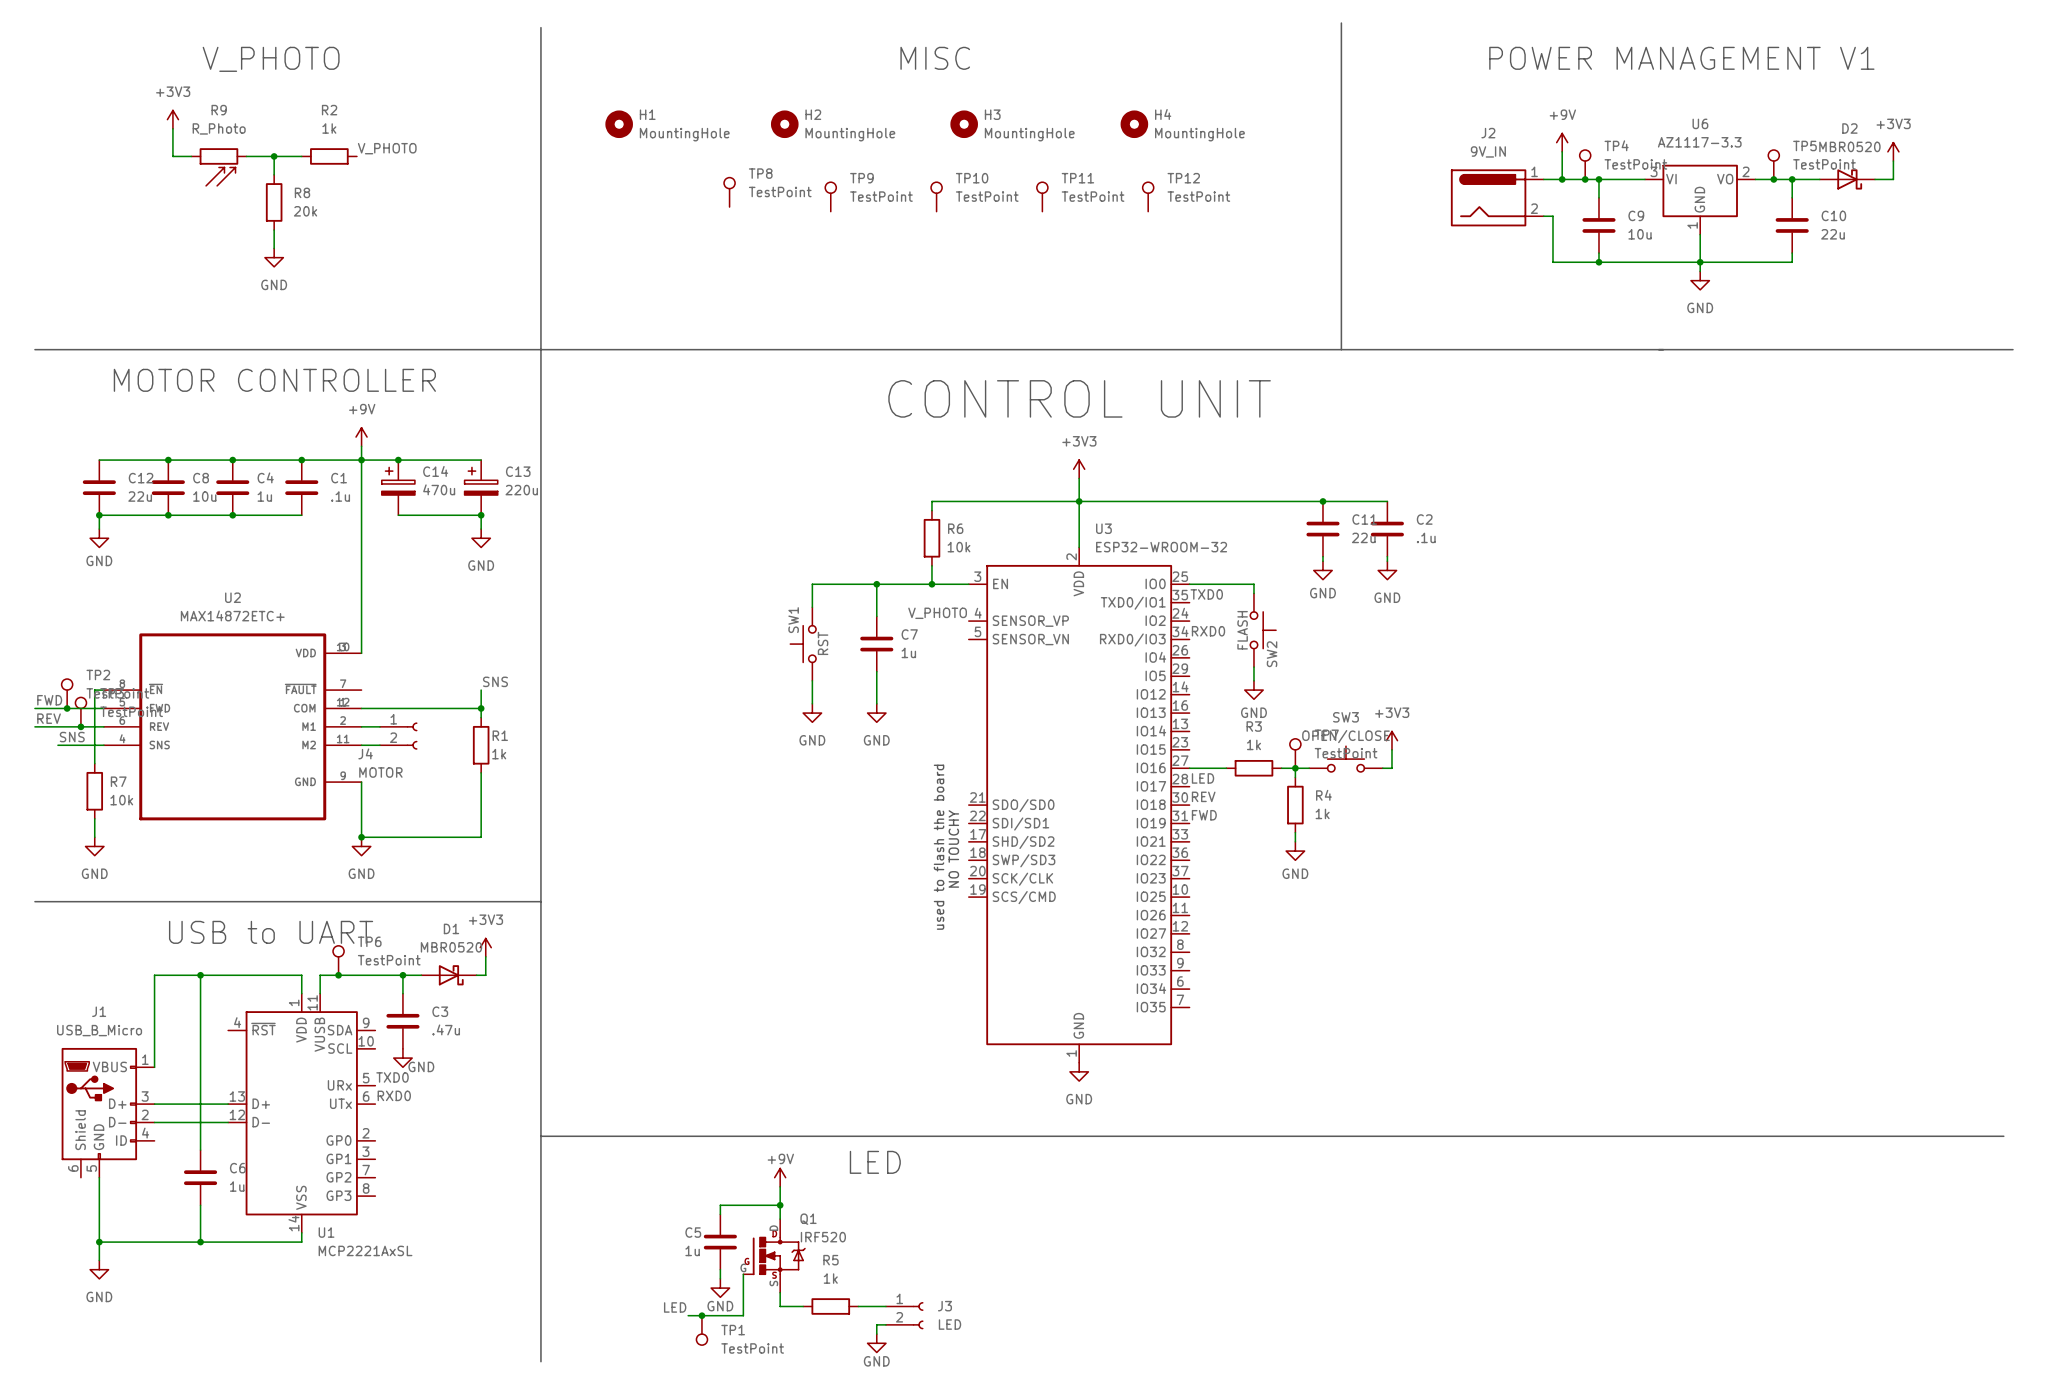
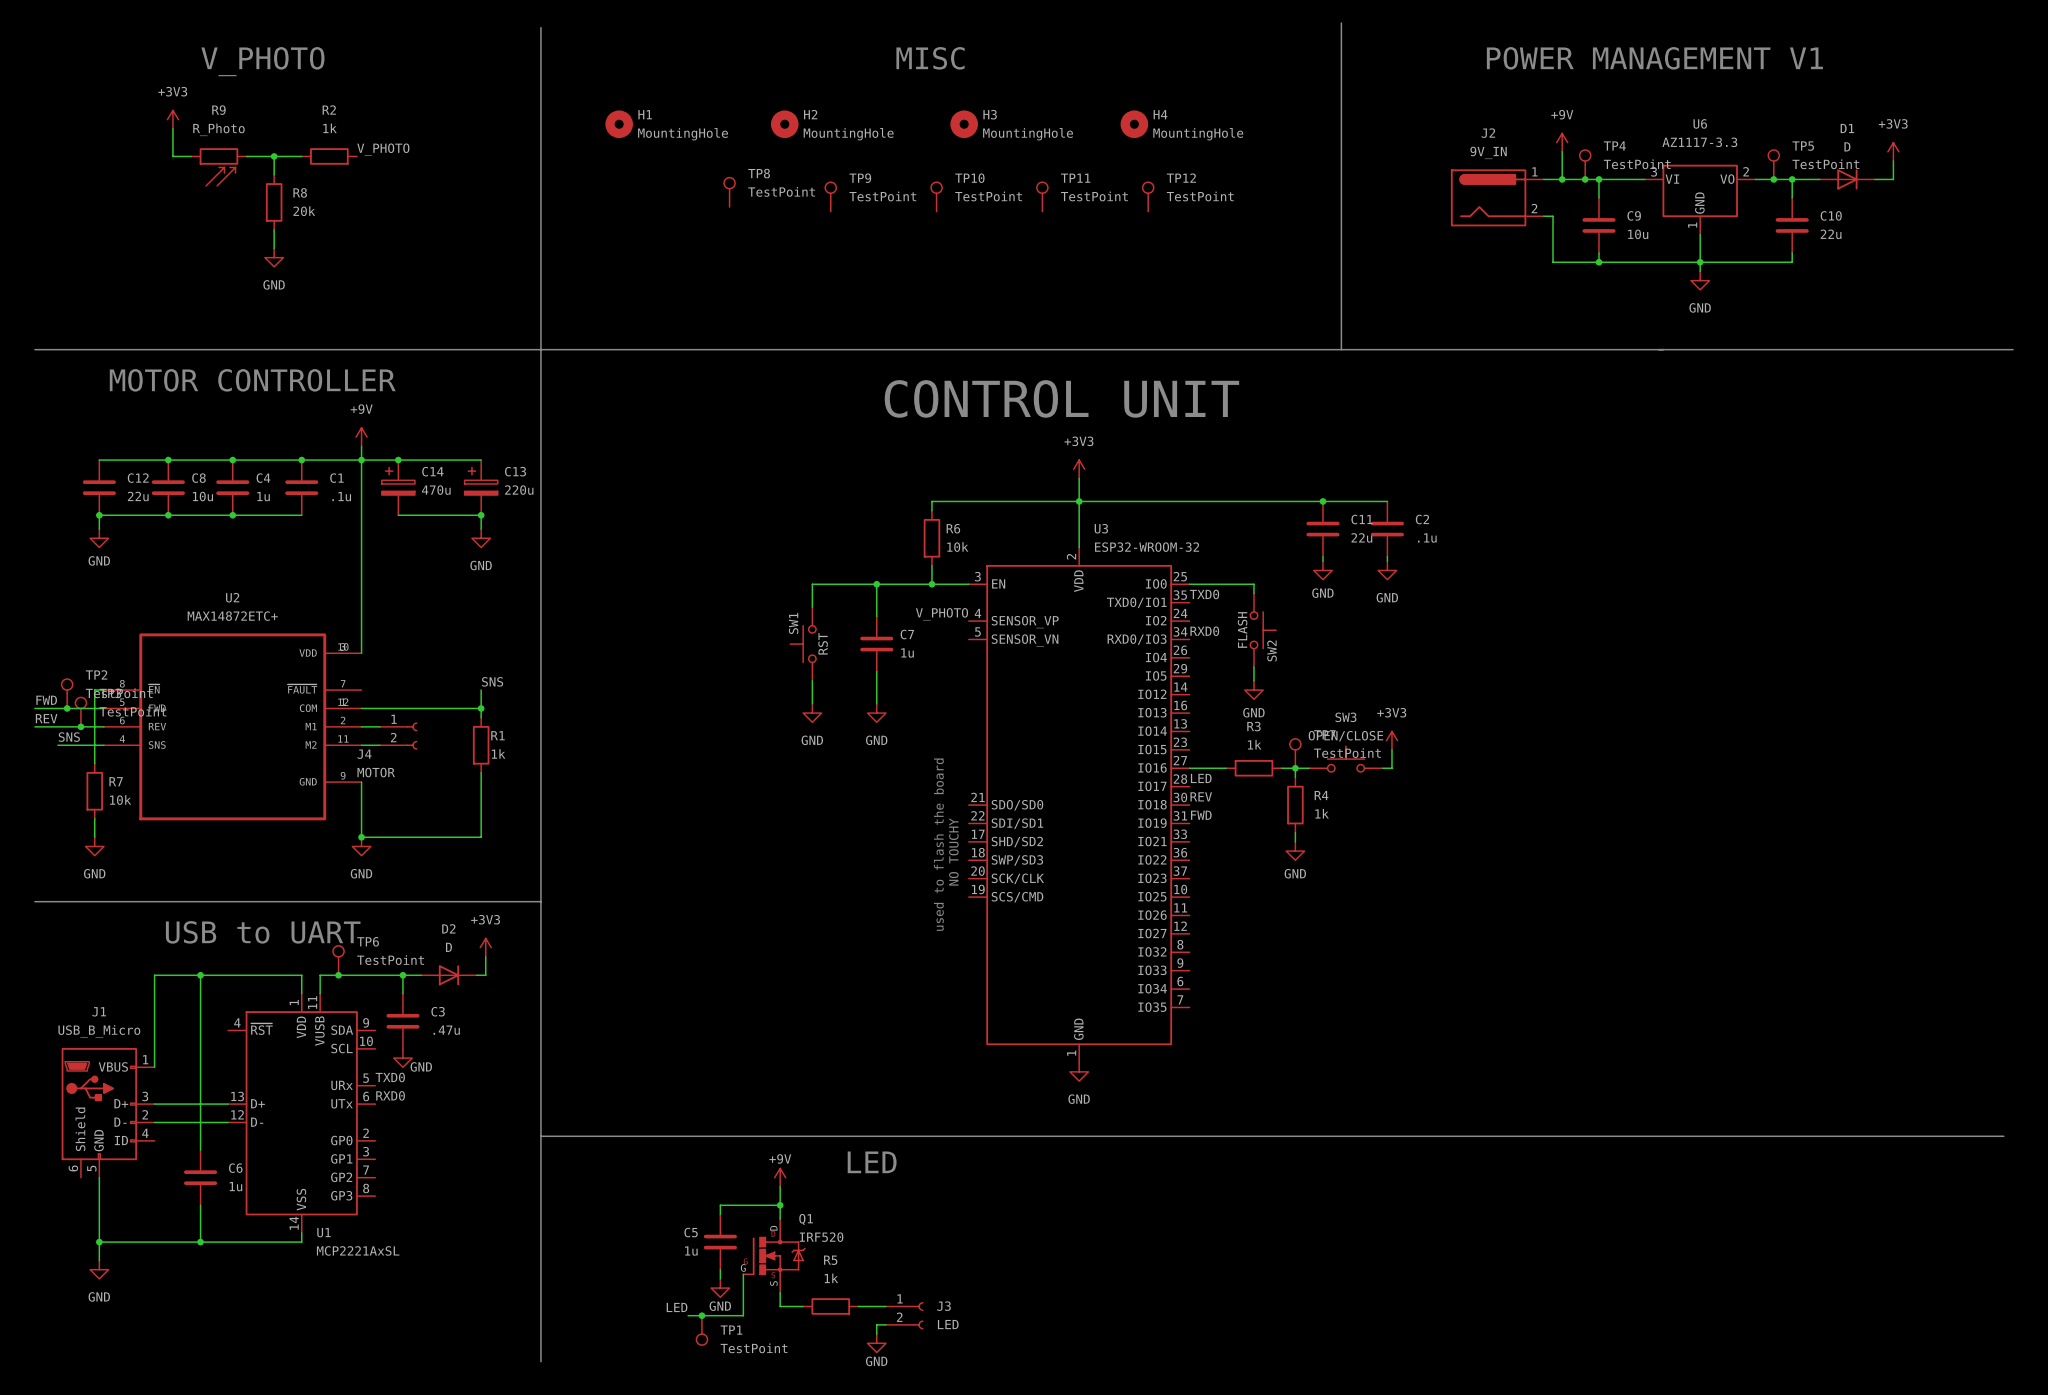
D2 value: MBR0520 (1849, 146) -> D (448, 947)
D2 symbol: [1819, 169, 1876, 190] -> [421, 965, 477, 986]
D1 value: MBR0520 (451, 947) -> D (1847, 146)
D1 symbol: [421, 965, 477, 986] -> [1819, 169, 1876, 190]

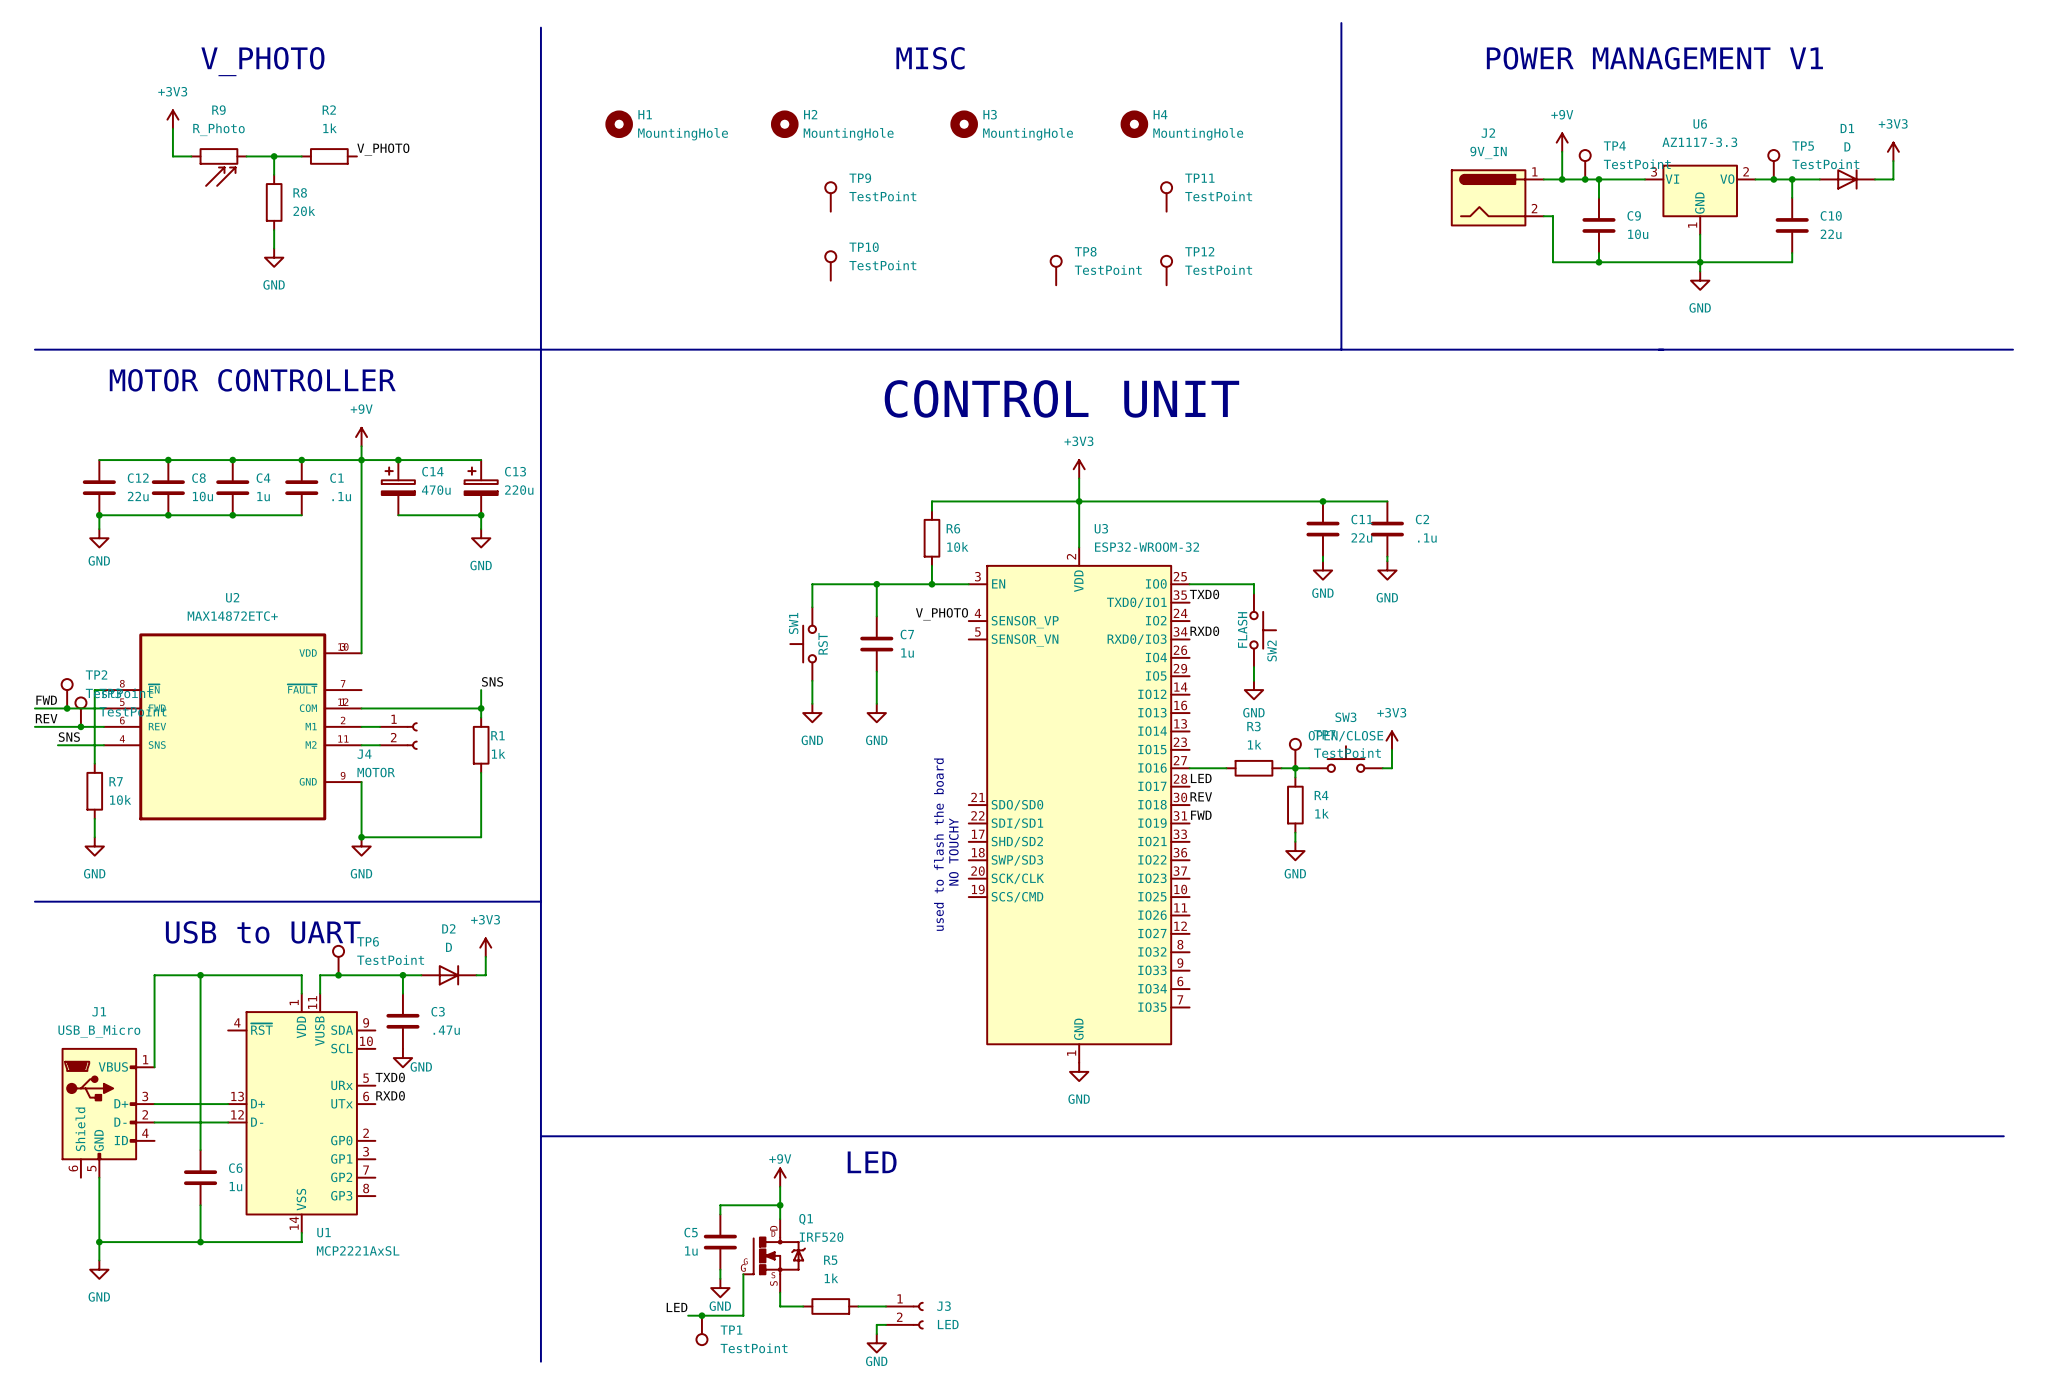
TP8 position: (729, 192) -> (1056, 270)
TP10 position: (936, 196) -> (830, 265)
TP11 position: (1042, 196) -> (1166, 196)
TP12 position: (1148, 196) -> (1166, 270)

